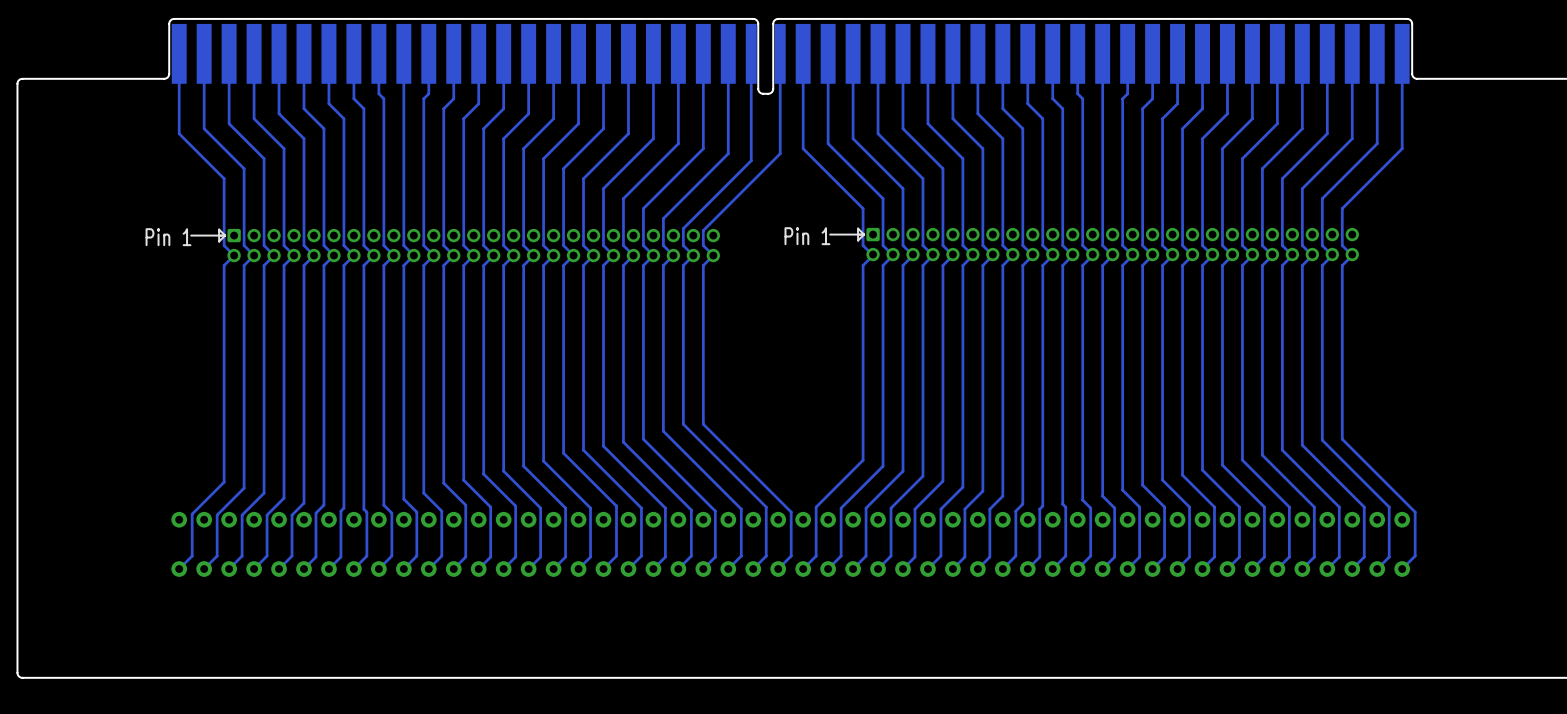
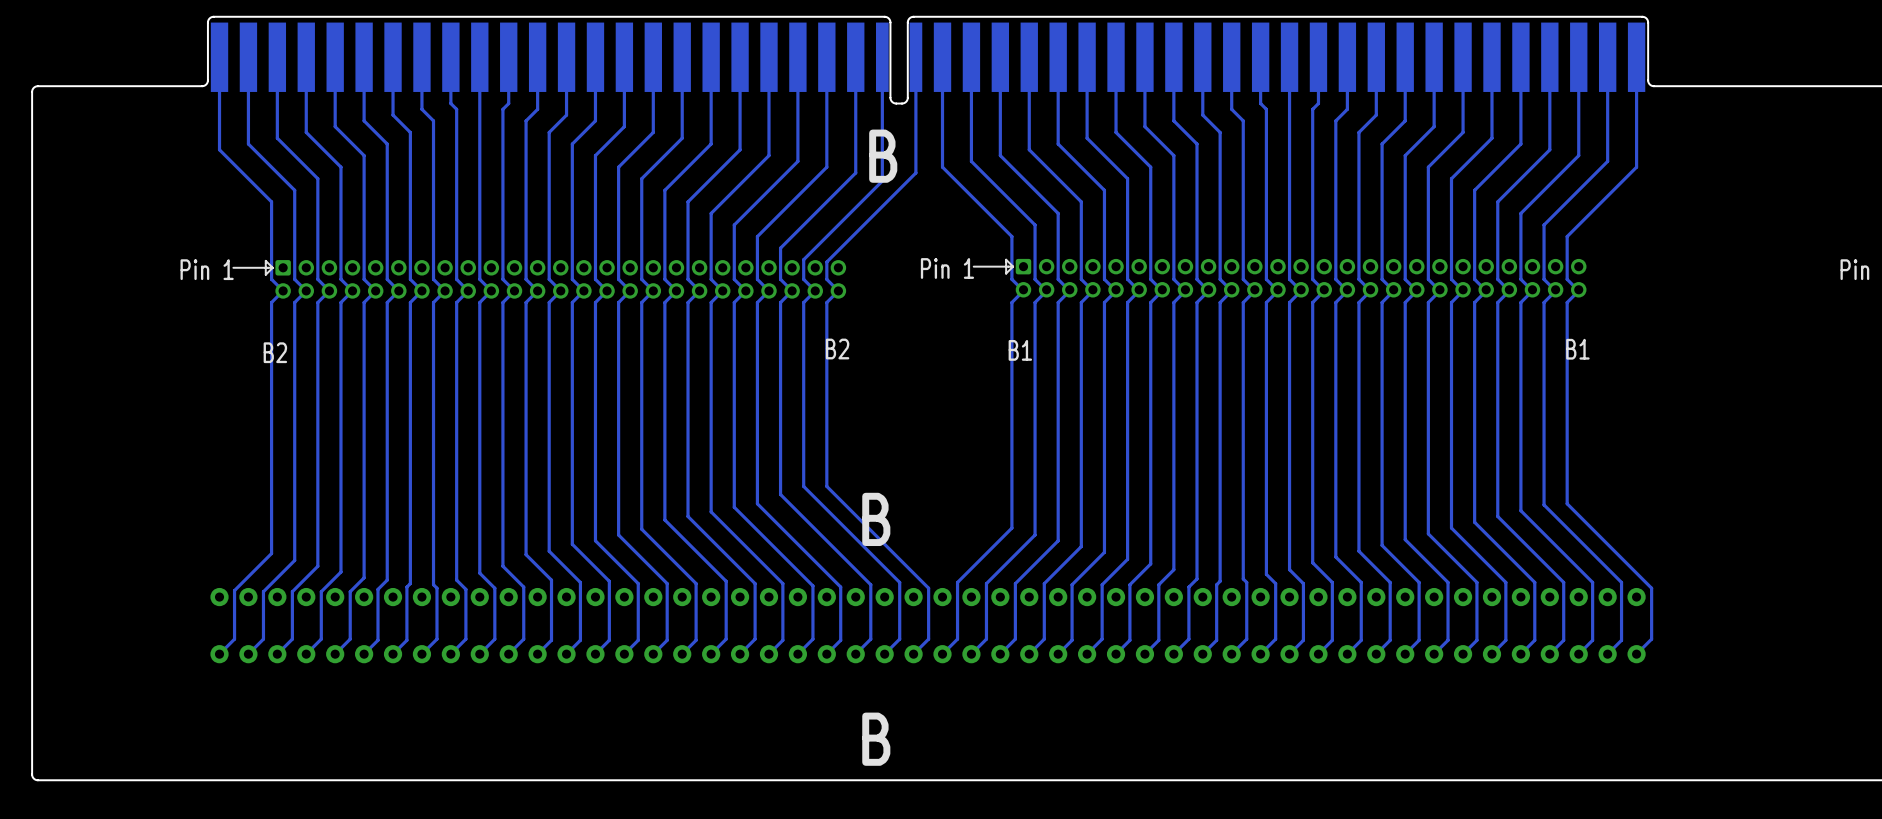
text: none -> B (883, 156)
text: none -> B2 (837, 349)
text: none -> B1 (1577, 349)
text: none -> B1 (1020, 350)
text: none -> B2 (275, 352)
text: none -> B (876, 519)
text: none -> B (876, 739)

